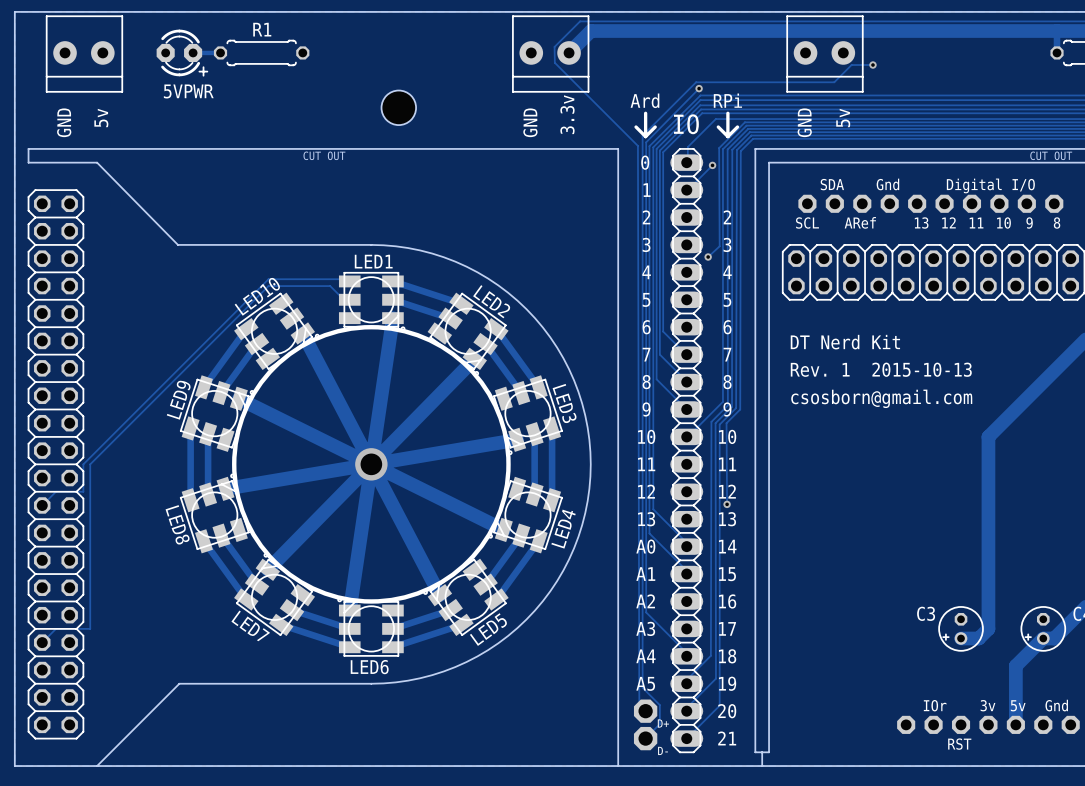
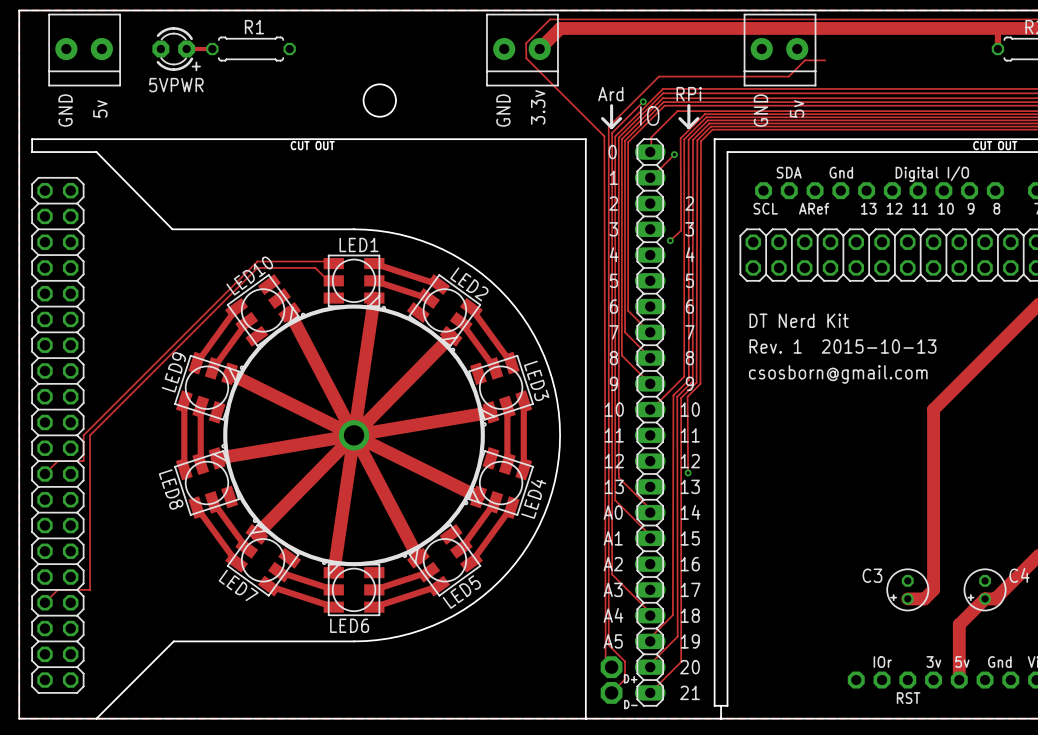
via: (872, 65) -> none
track: (699, 88) (646, 142) -> (643, 101) (612, 132)
via position: (699, 88) -> (643, 101)

